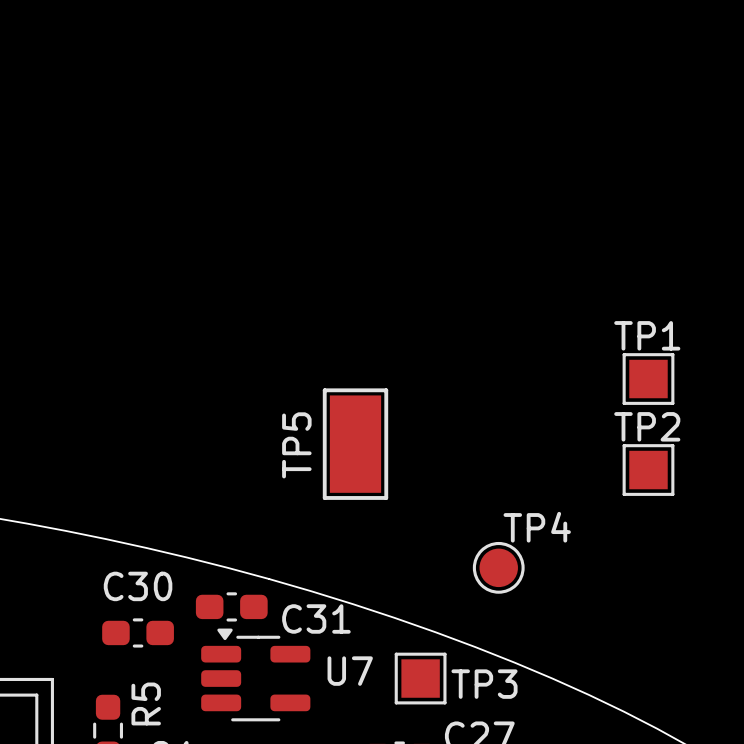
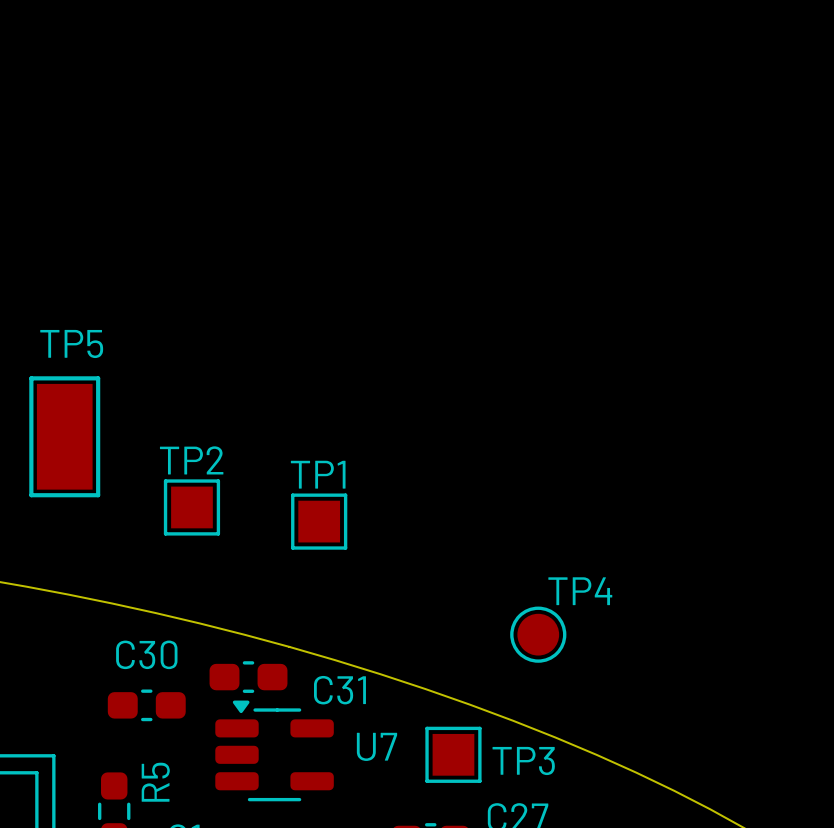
TP1 position: (648, 379) -> (319, 521)
TP5 position: (355, 444) -> (64, 436)
TP5 name rotation: 0° (296, 445) -> 90° clockwise (71, 343)
TP5 name position: TP5 (296, 445) -> TP5 (71, 343)
TP2 position: (648, 470) -> (191, 507)

